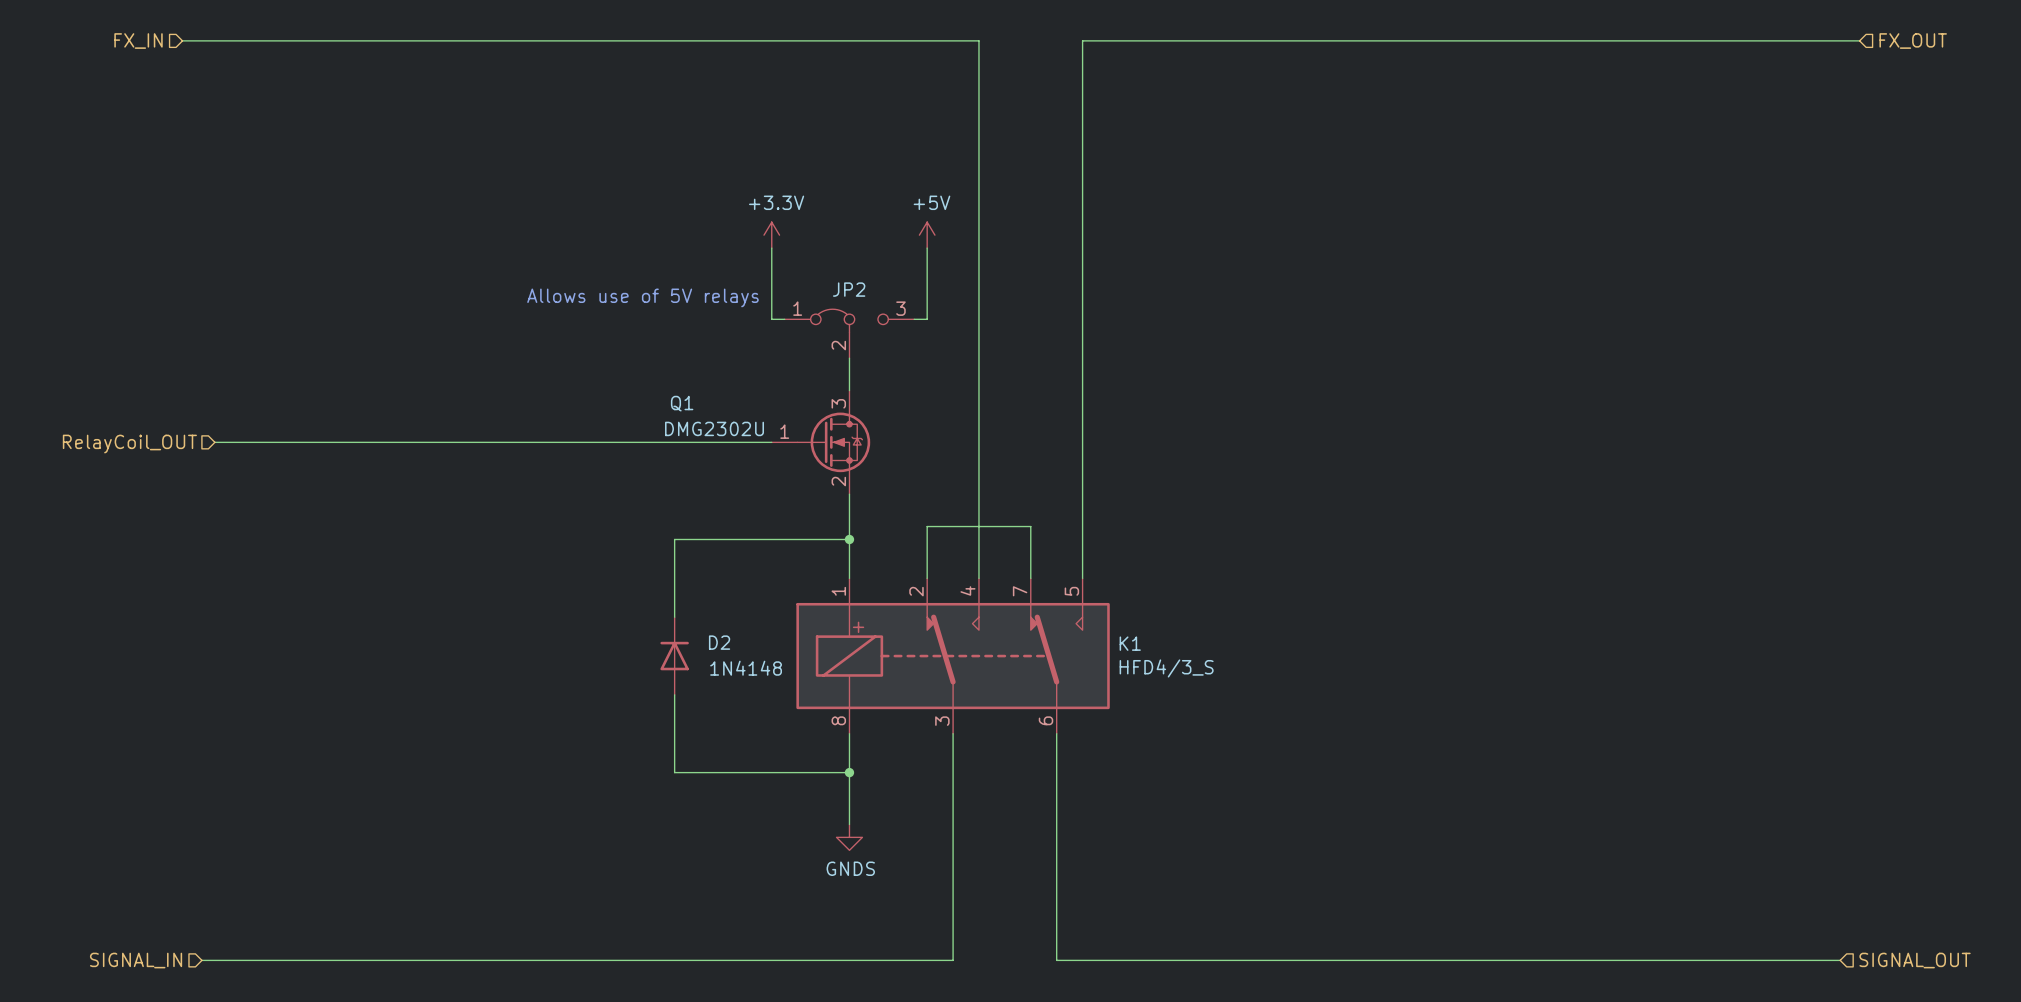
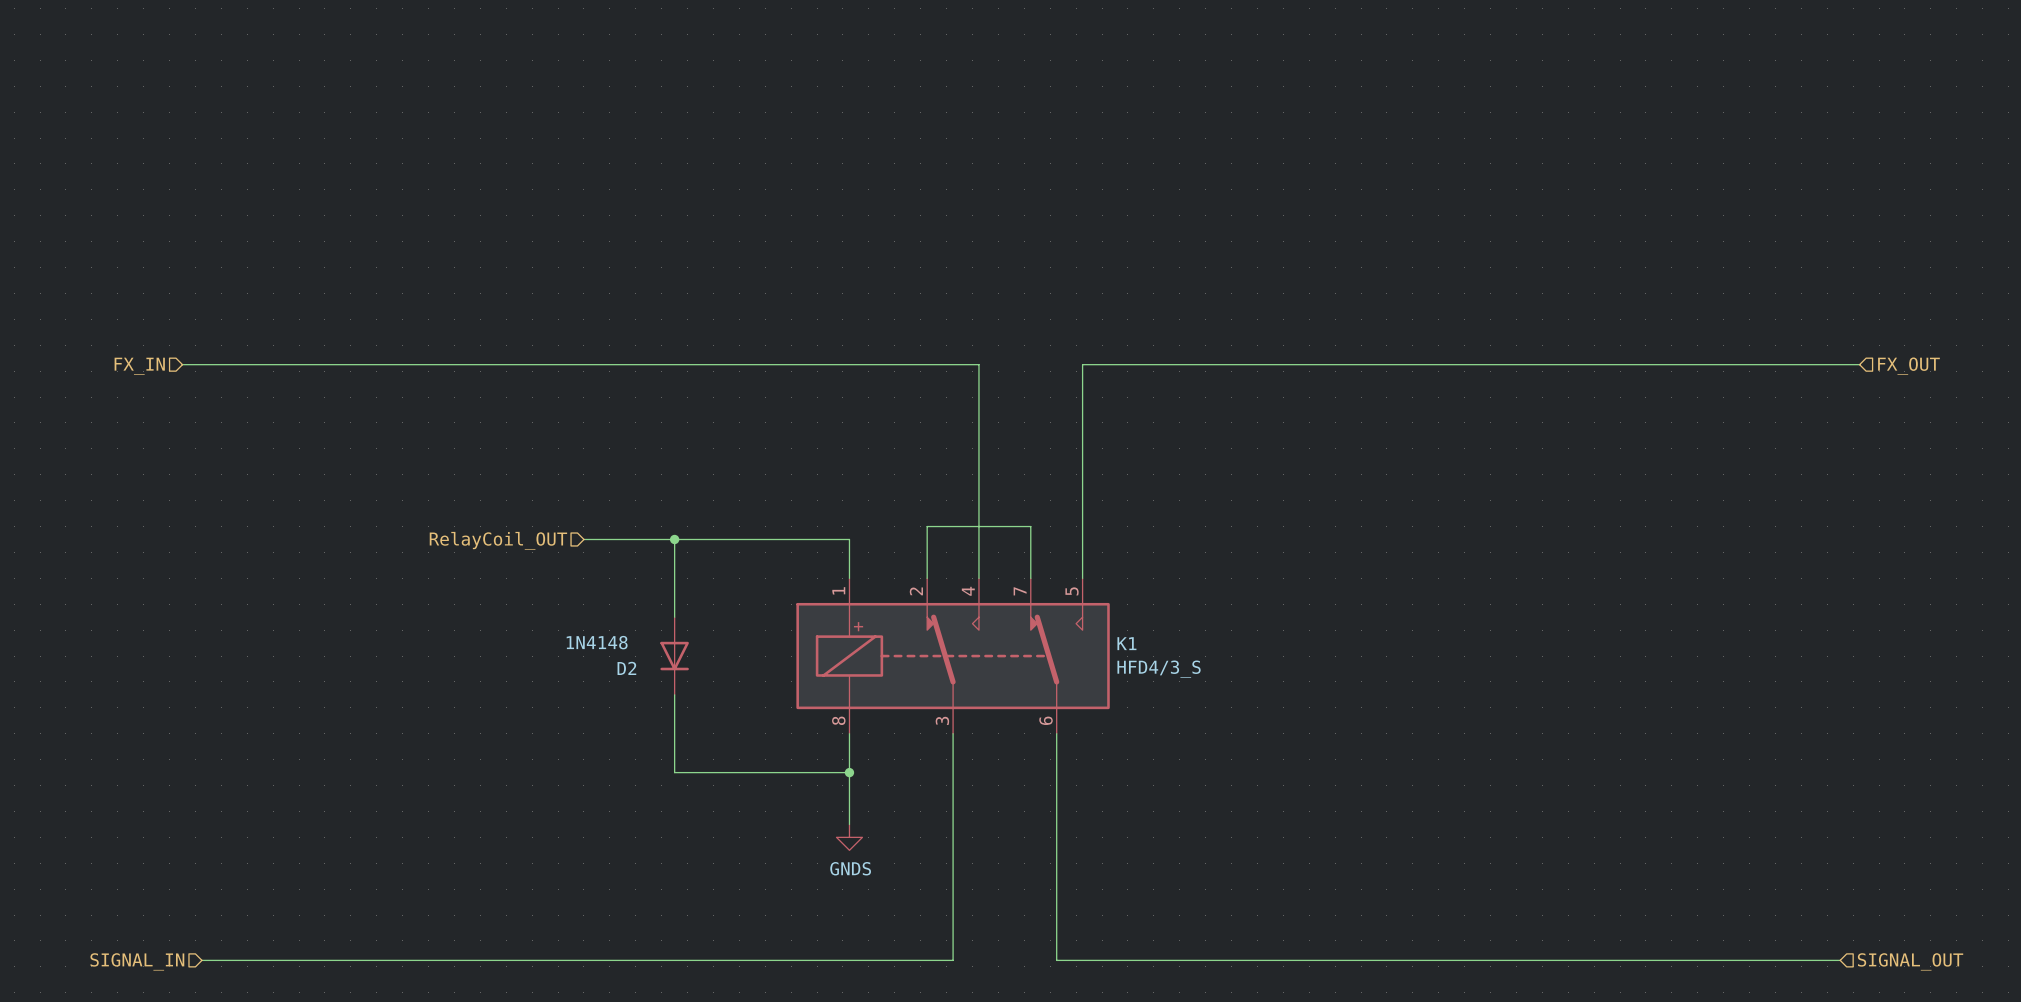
wire: (182, 40) (978, 40) (978, 364) -> (182, 364) (978, 364)
wire: (1859, 40) (1082, 40) (1082, 364) -> (1859, 364) (1082, 364)
hierarchical label: FX_IN (138, 41) -> none
hierarchical label: FX_OUT (1913, 41) -> none
power symbol: +3.3V (771, 235) -> none
power symbol: +5V (927, 235) -> none
wire: (771, 248) (771, 319) (784, 319) -> none
wire: (927, 248) (927, 319) (914, 319) -> none
text: Allows use of 5V relays (642, 297) -> none
JP2: (849, 333) -> none
wire: (849, 358) (849, 390) -> none
hierarchical label: none -> FX_IN (139, 366)
hierarchical label: none -> FX_OUT (1908, 366)
wire: (214, 442) (771, 442) -> none
Q1: DMG2302U (820, 442) -> none
hierarchical label: RelayCoil_OUT (129, 444) -> none
wire: (849, 494) (849, 539) -> none
wire: none -> (583, 539) (674, 539)
junction: none -> (674, 539)
junction: (849, 539) -> none
hierarchical label: none -> RelayCoil_OUT (498, 540)
D2 rotation: 0° (674, 656) -> 180° (674, 656)

